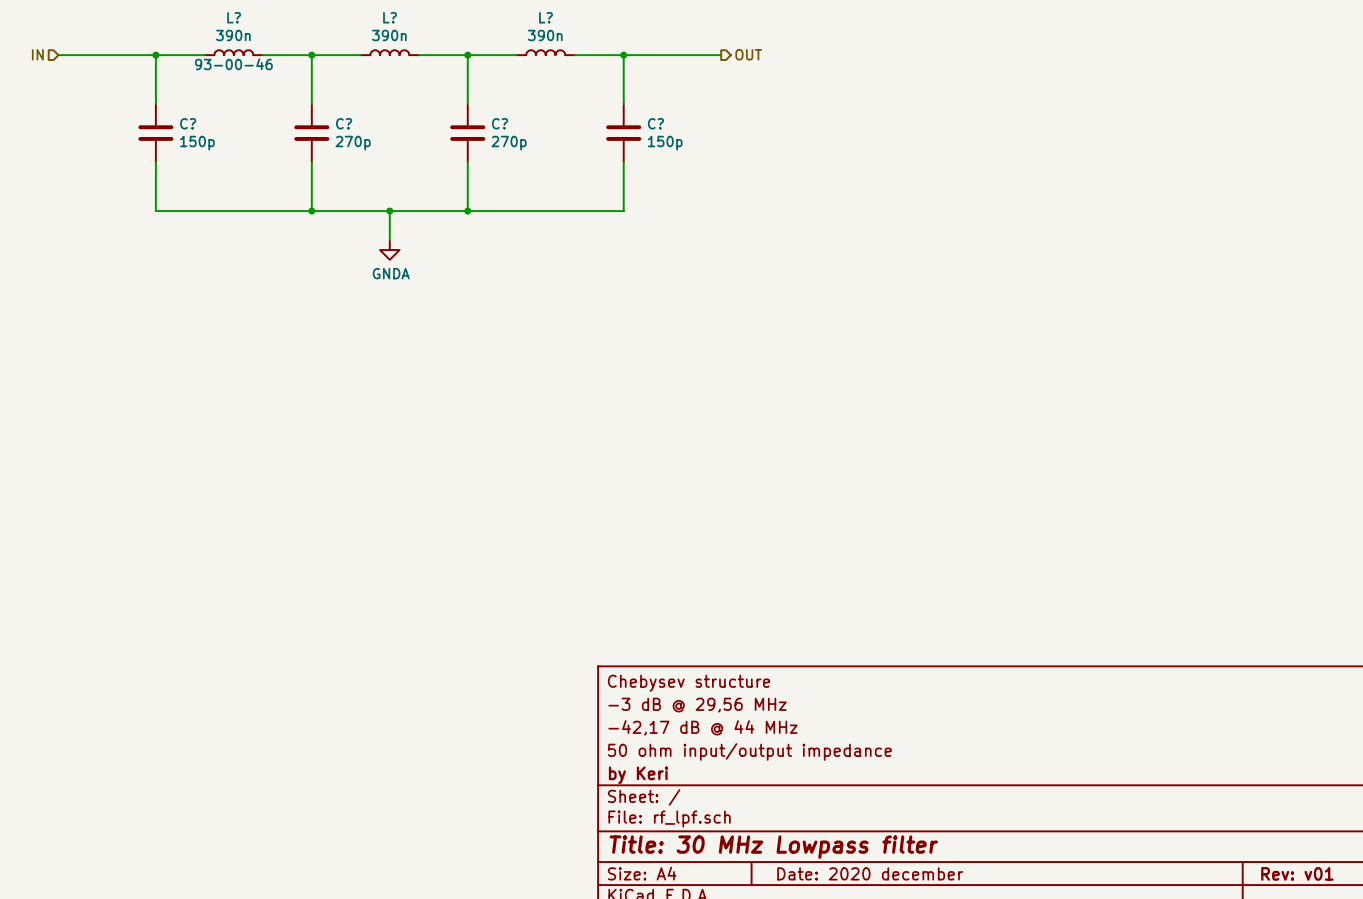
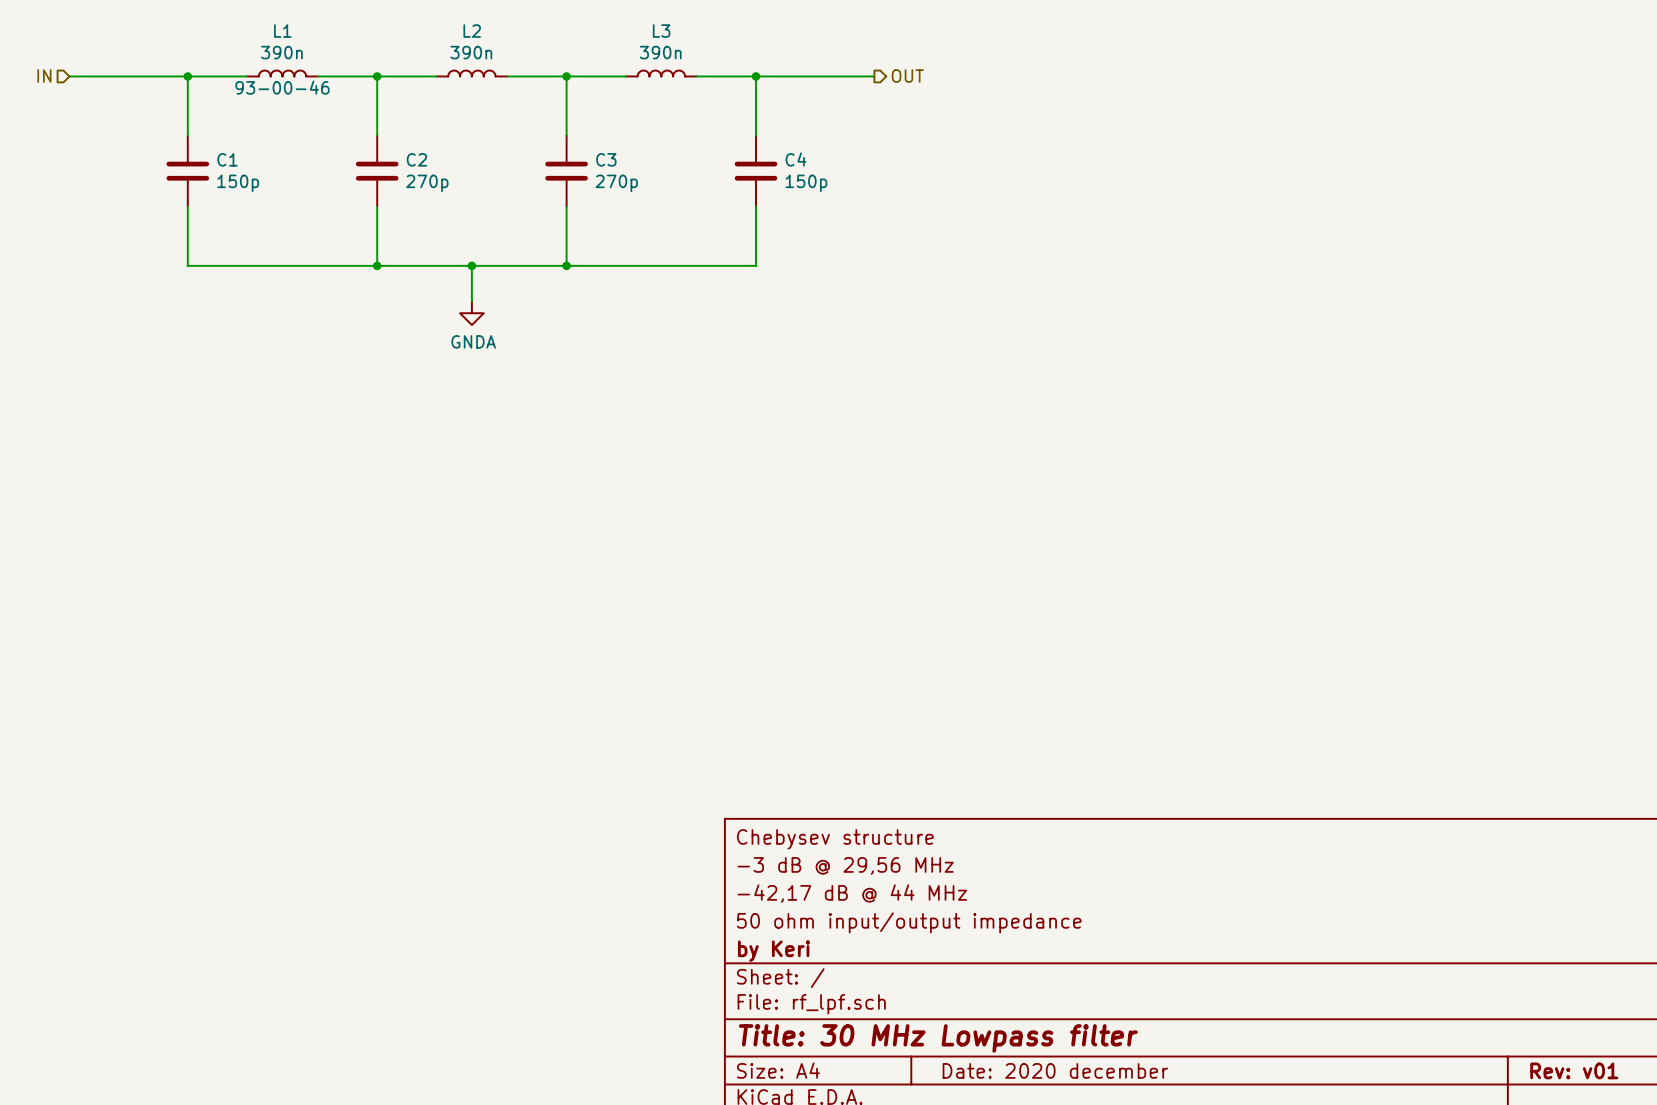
L? name: L? (234, 17) -> L1 (282, 31)
L? name: L? (390, 17) -> L2 (472, 31)
L? name: L? (545, 17) -> L3 (661, 31)
C? name: C? (188, 123) -> C1 (227, 159)
C? name: C? (344, 123) -> C2 (416, 159)
C? name: C? (500, 123) -> C3 (606, 159)
C? name: C? (655, 123) -> C4 (796, 159)

